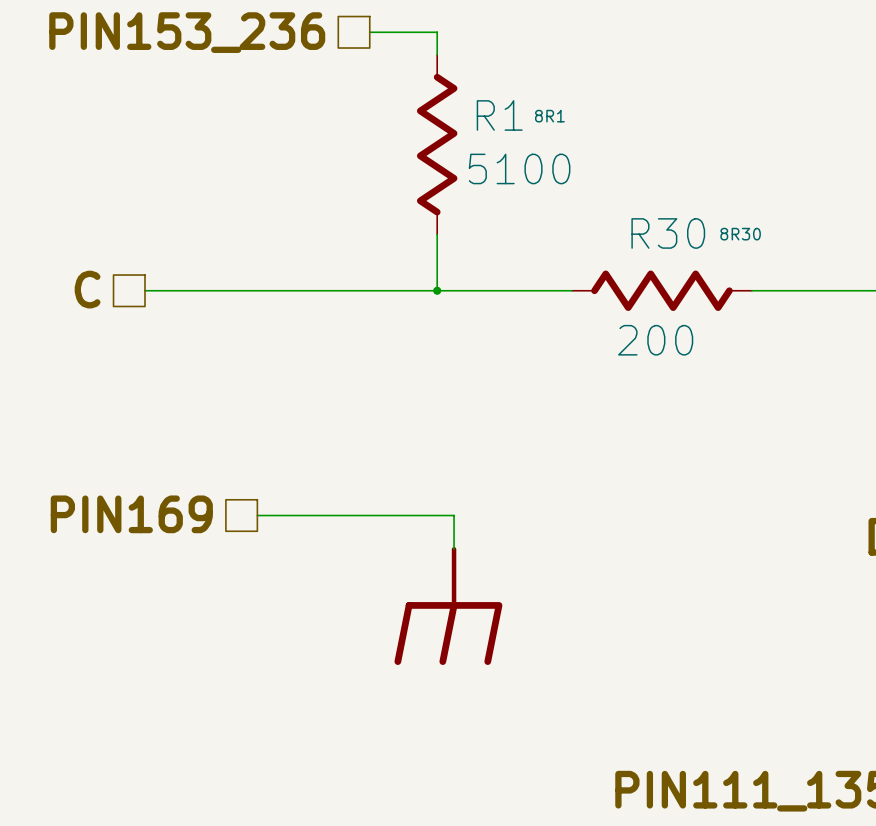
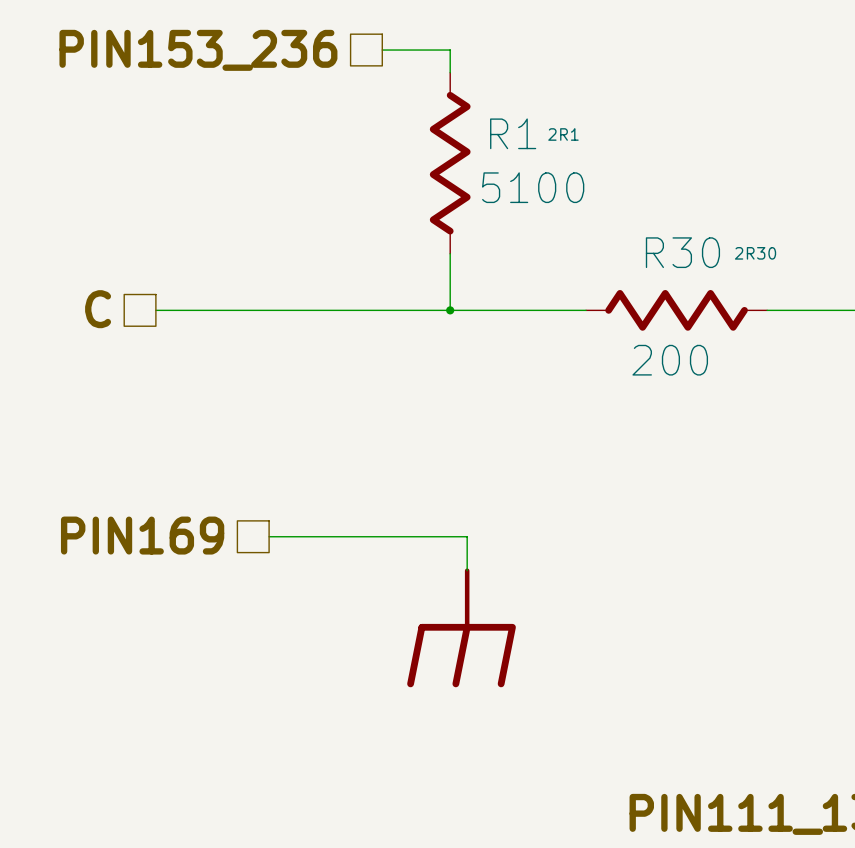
8R1 name: 8R1 (549, 116) -> 2R1 (563, 134)
8R30 name: 8R30 (740, 234) -> 2R30 (755, 253)

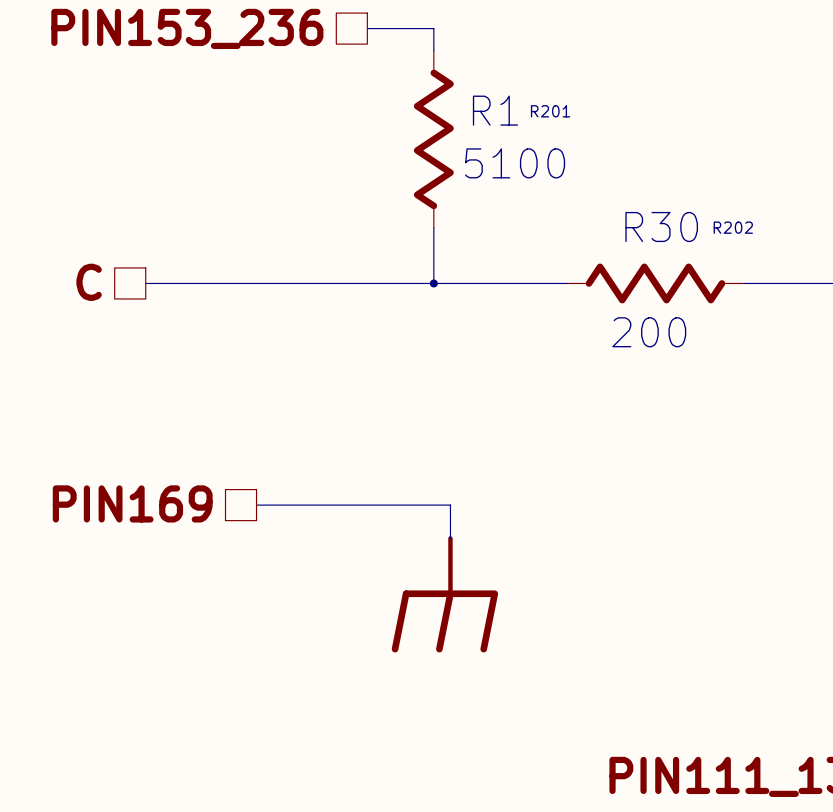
2R1 name: 2R1 (563, 134) -> R201 (550, 111)
2R30 name: 2R30 (755, 253) -> R202 (733, 227)

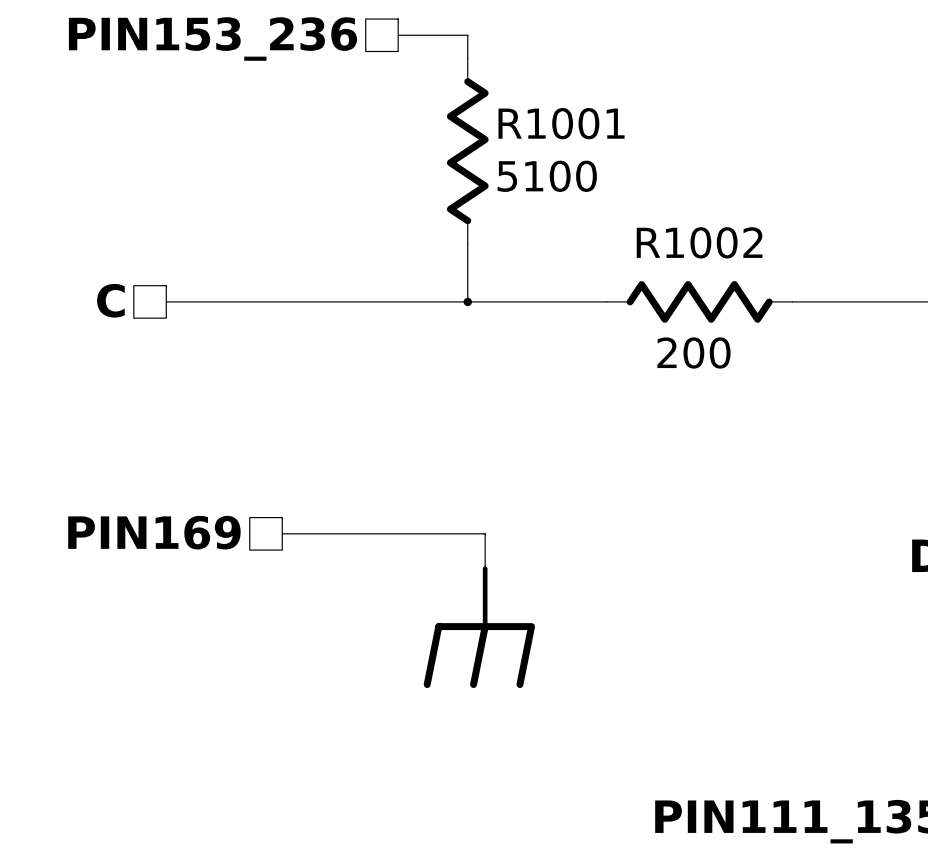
R201 text: R1 (495, 110) -> none
R201 name: R201 (550, 111) -> R1001 (561, 123)
R202 text: R30 (661, 226) -> none
R202 name: R202 (733, 227) -> R1002 (699, 242)

